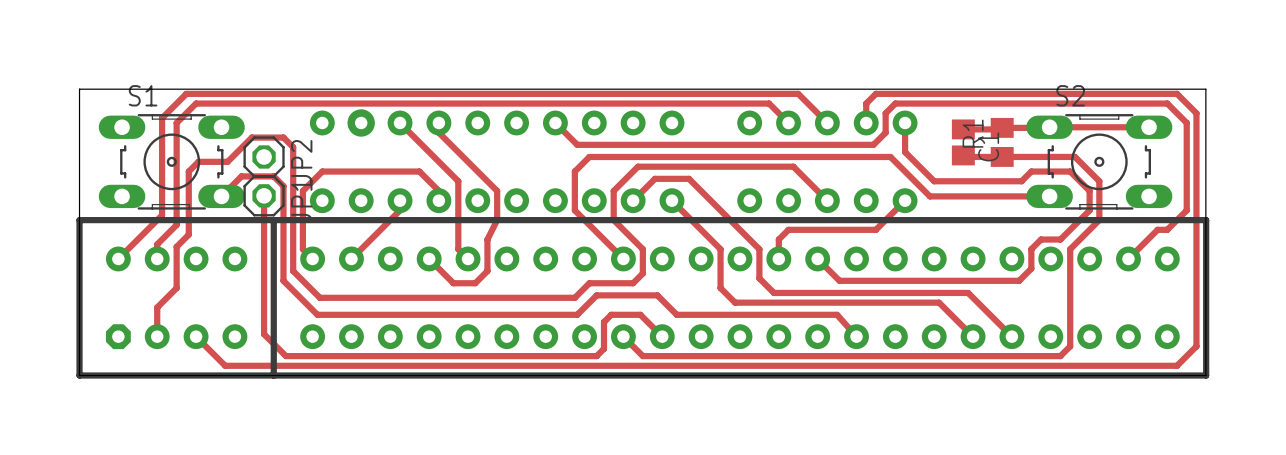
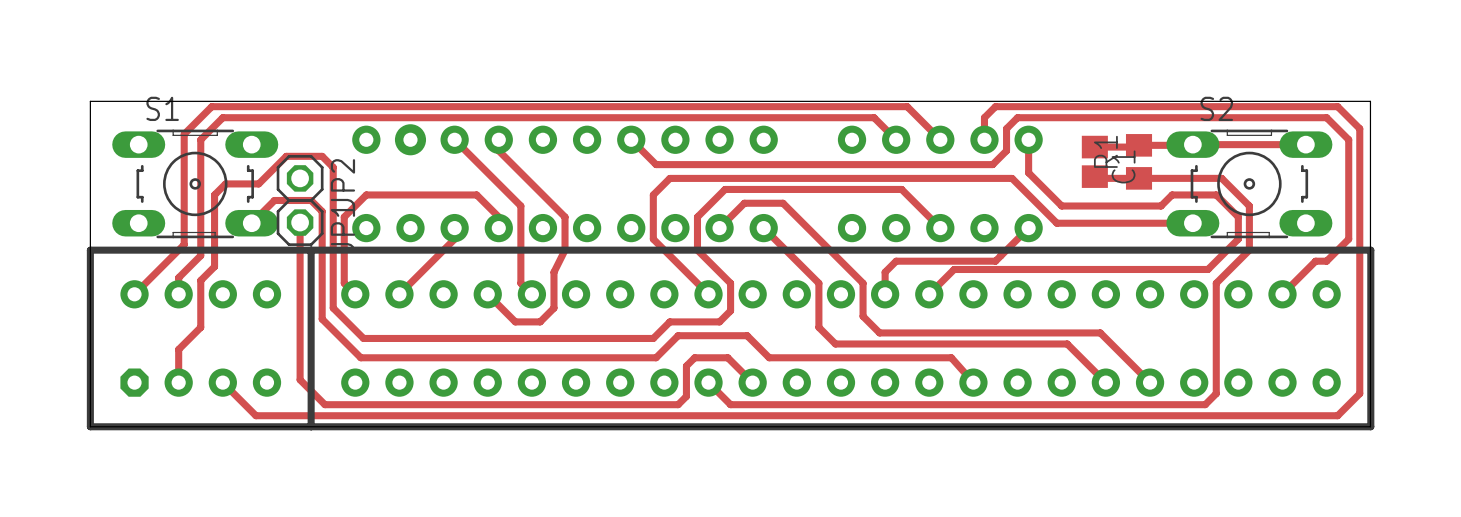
track: (1062, 237) (1060, 239) (1041, 239) (1031, 249) (1031, 268) (1019, 280) (839, 280) (817, 258) -> (1207, 269) (954, 269) (929, 294)

